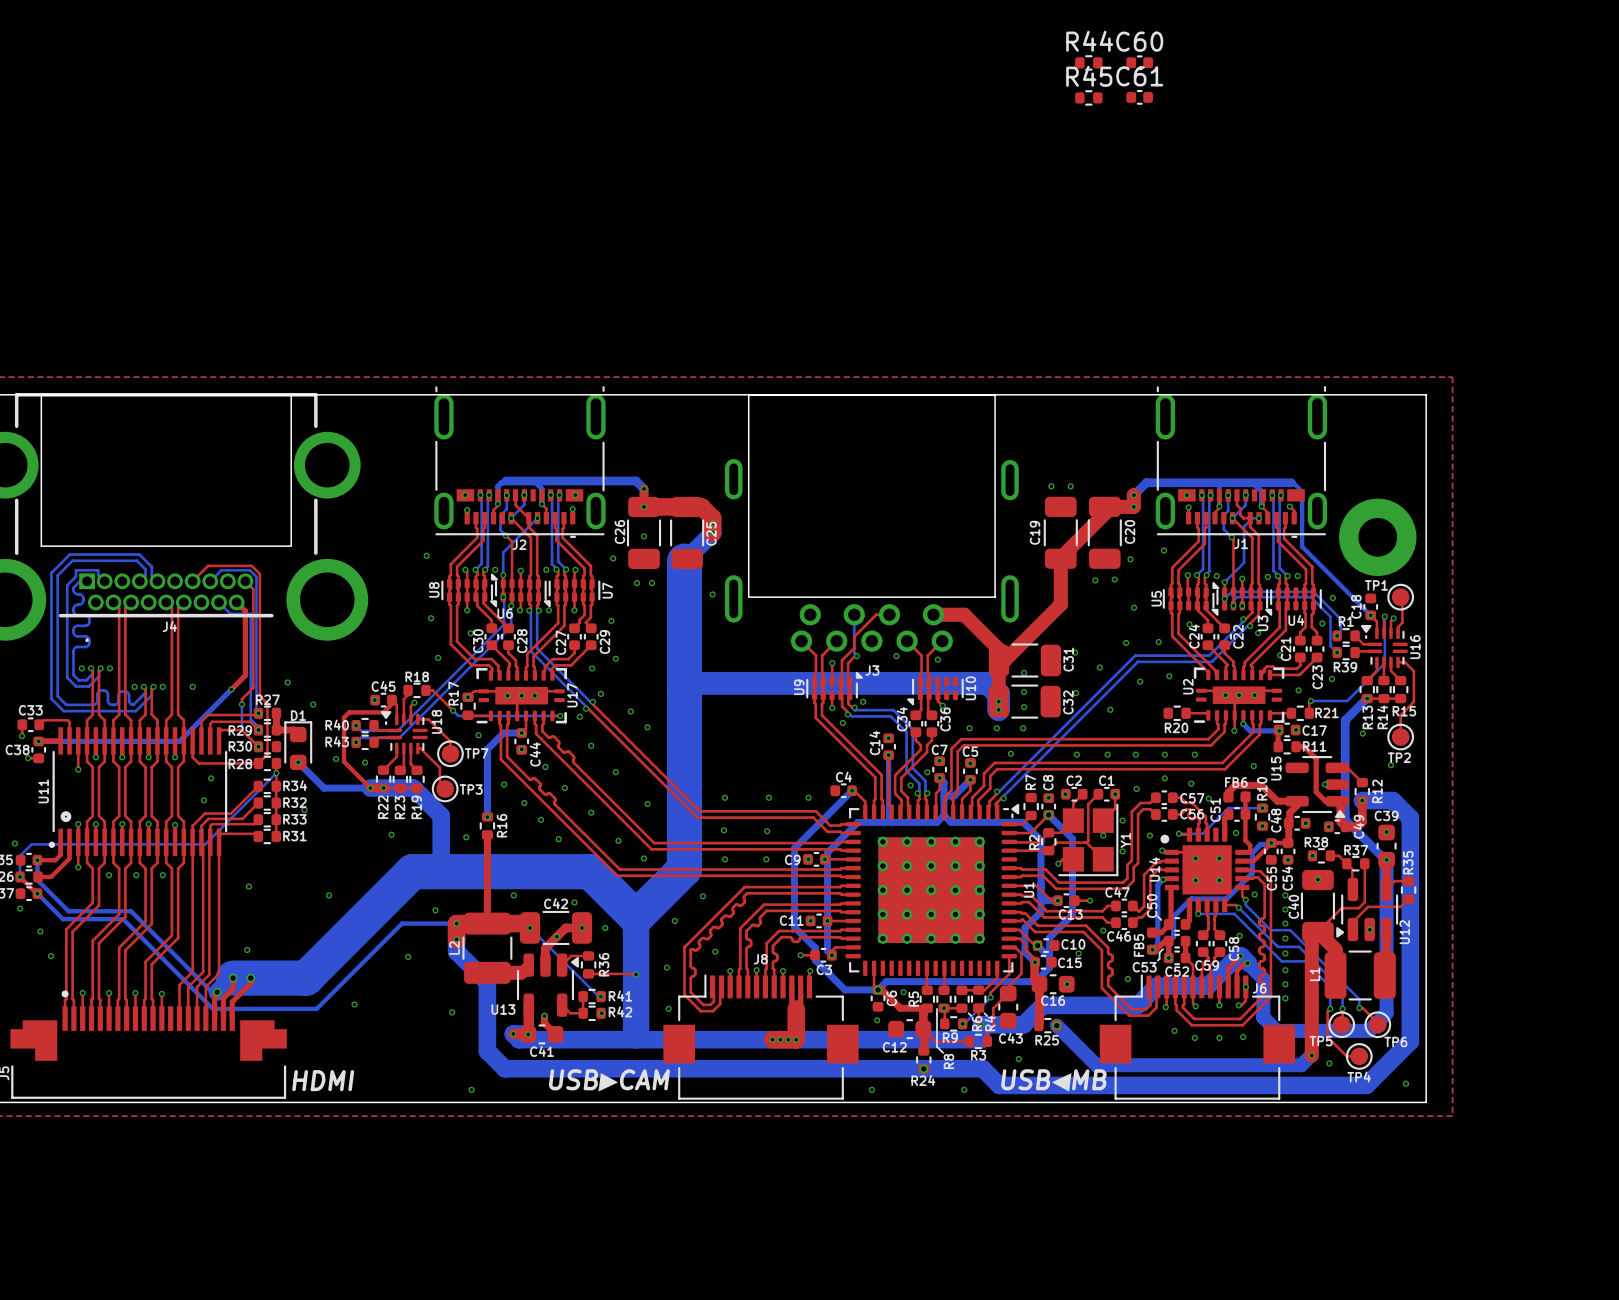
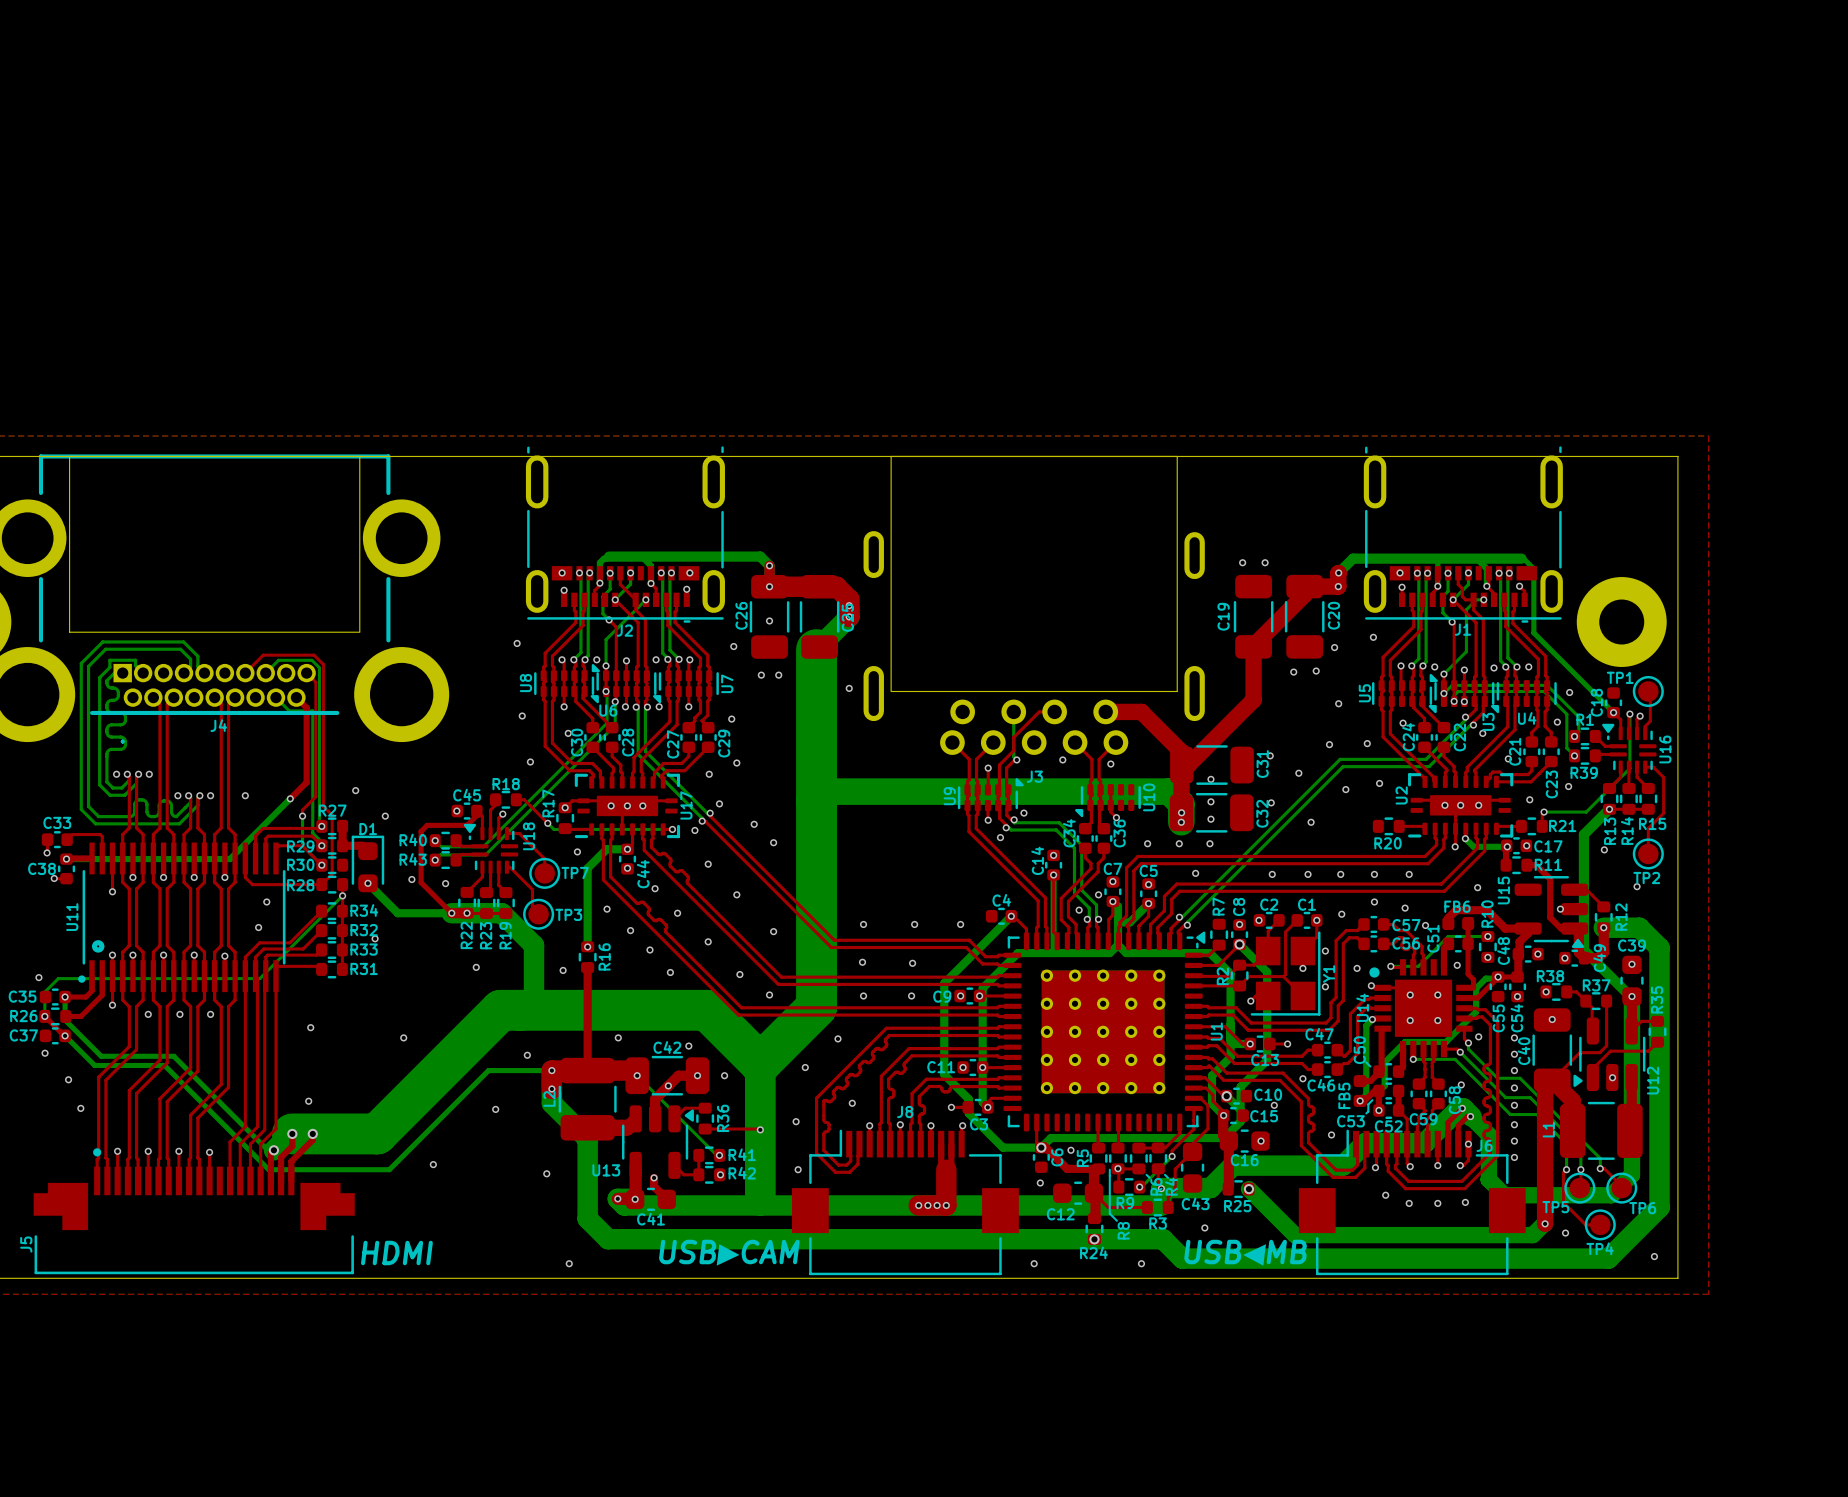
R44: (1088, 62) -> none
C60: (1139, 62) -> none
R45: (1088, 97) -> none
C61: (1139, 97) -> none

